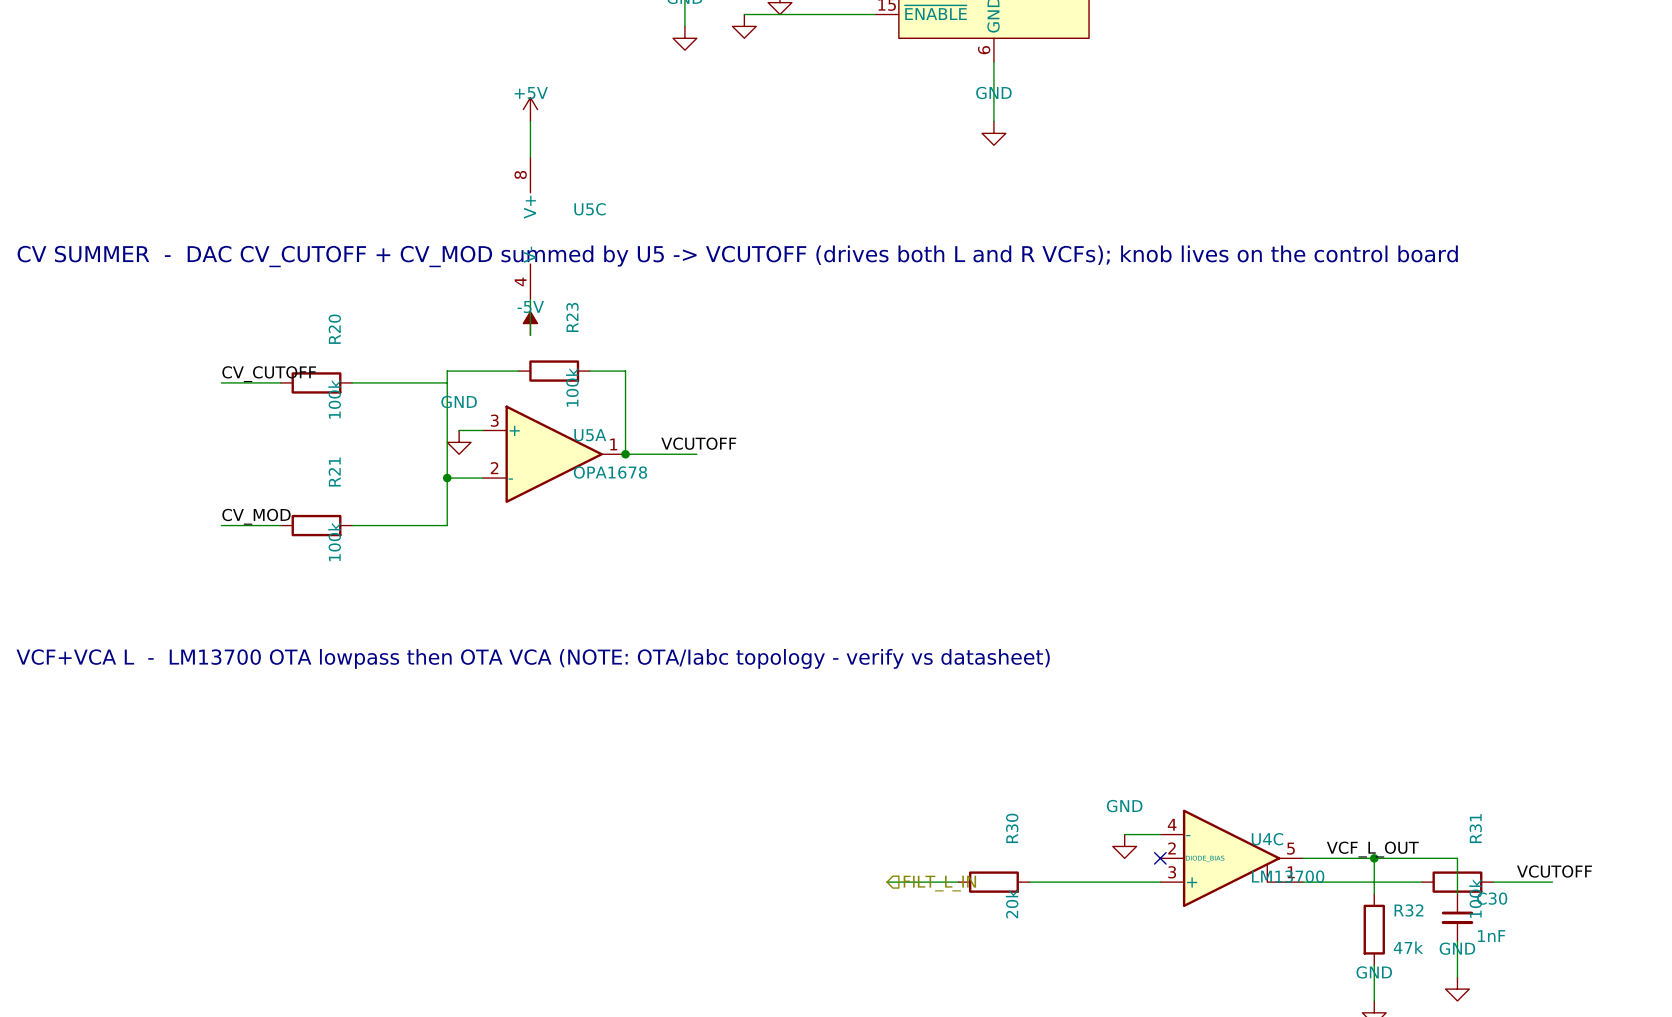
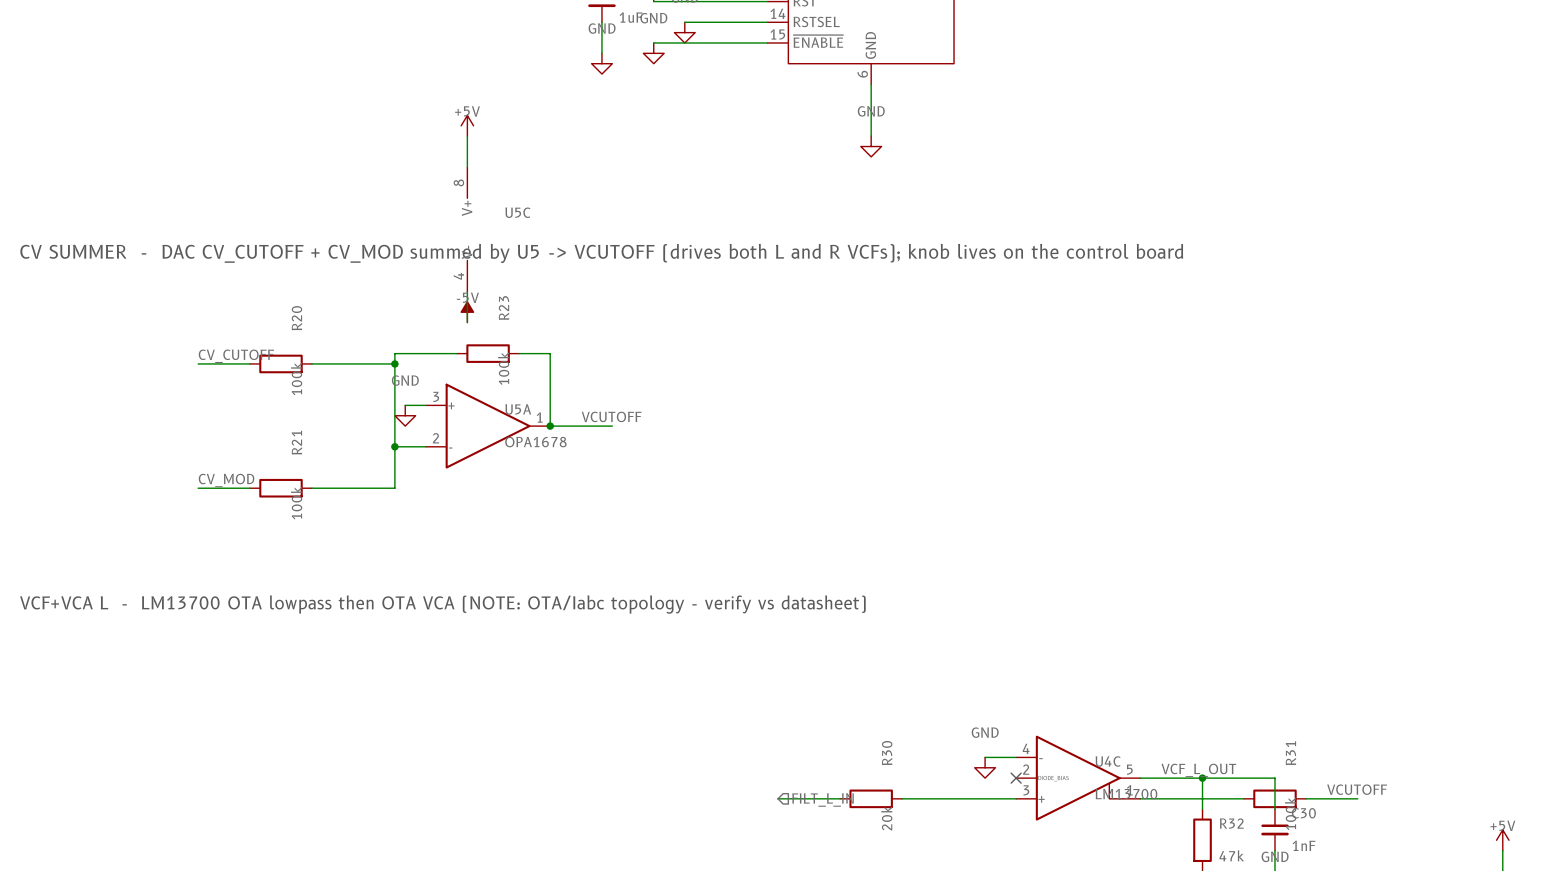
junction: none -> (394, 363)

